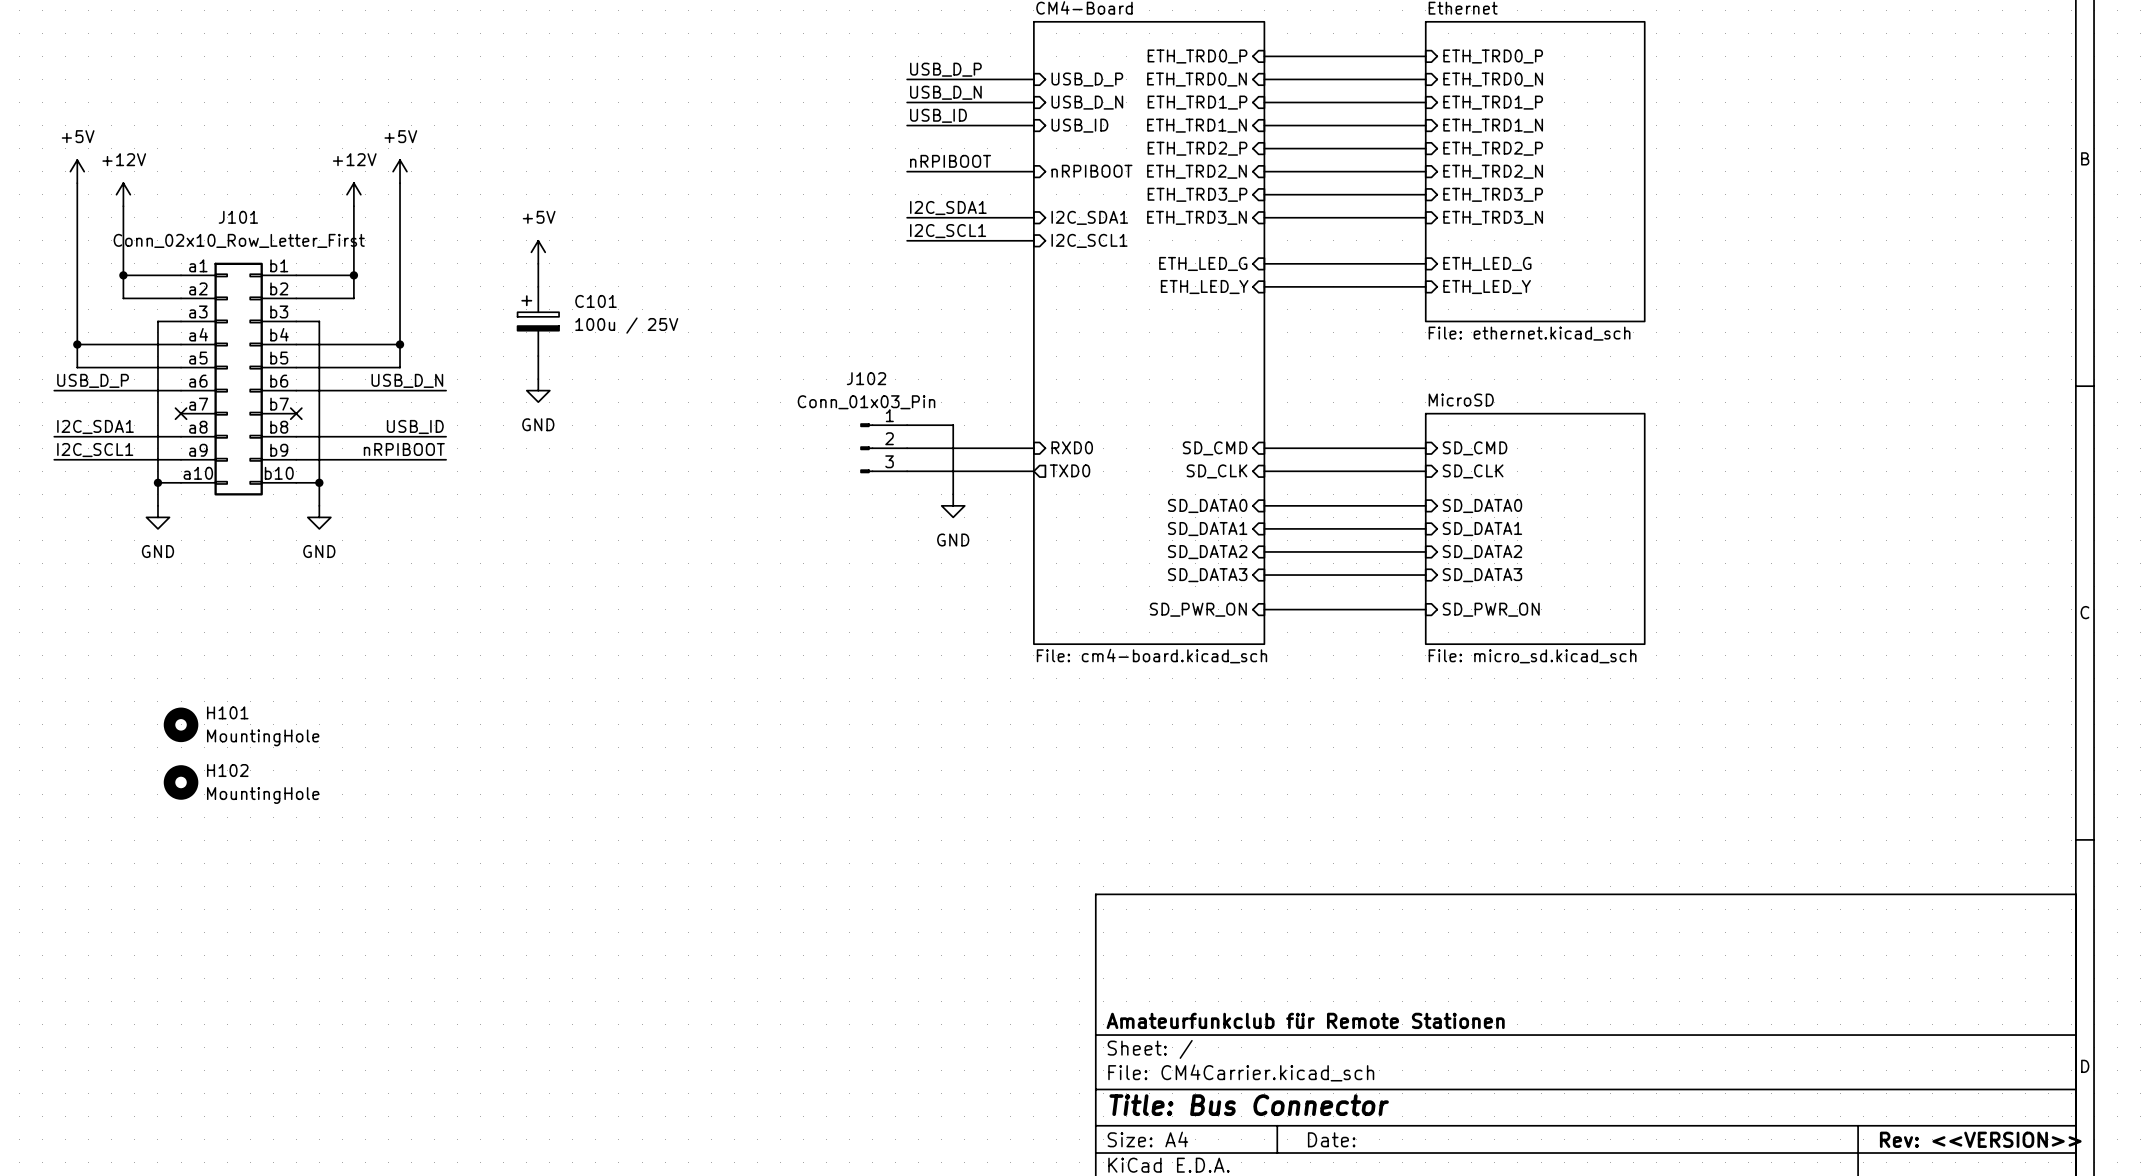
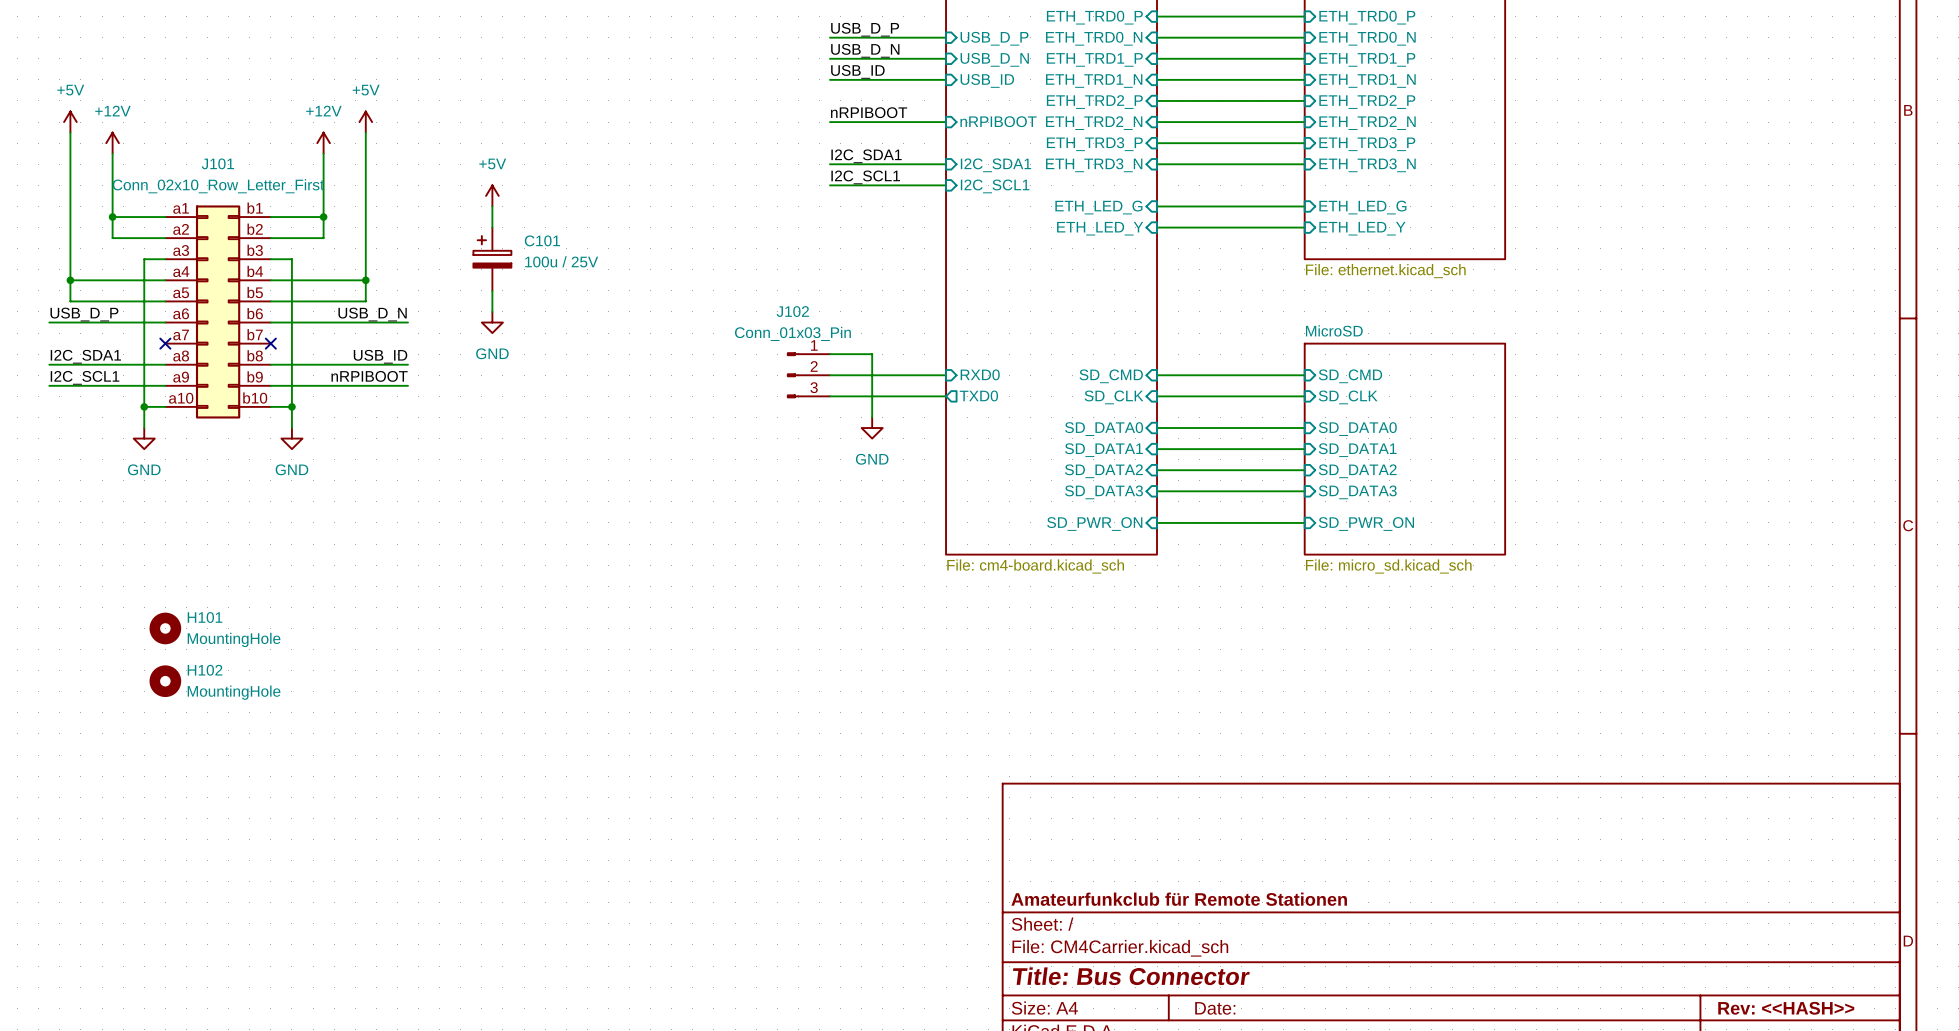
title block: Rev: <<VERSION>> (1980, 1139) -> Rev: <<HASH>> (1786, 1008)

